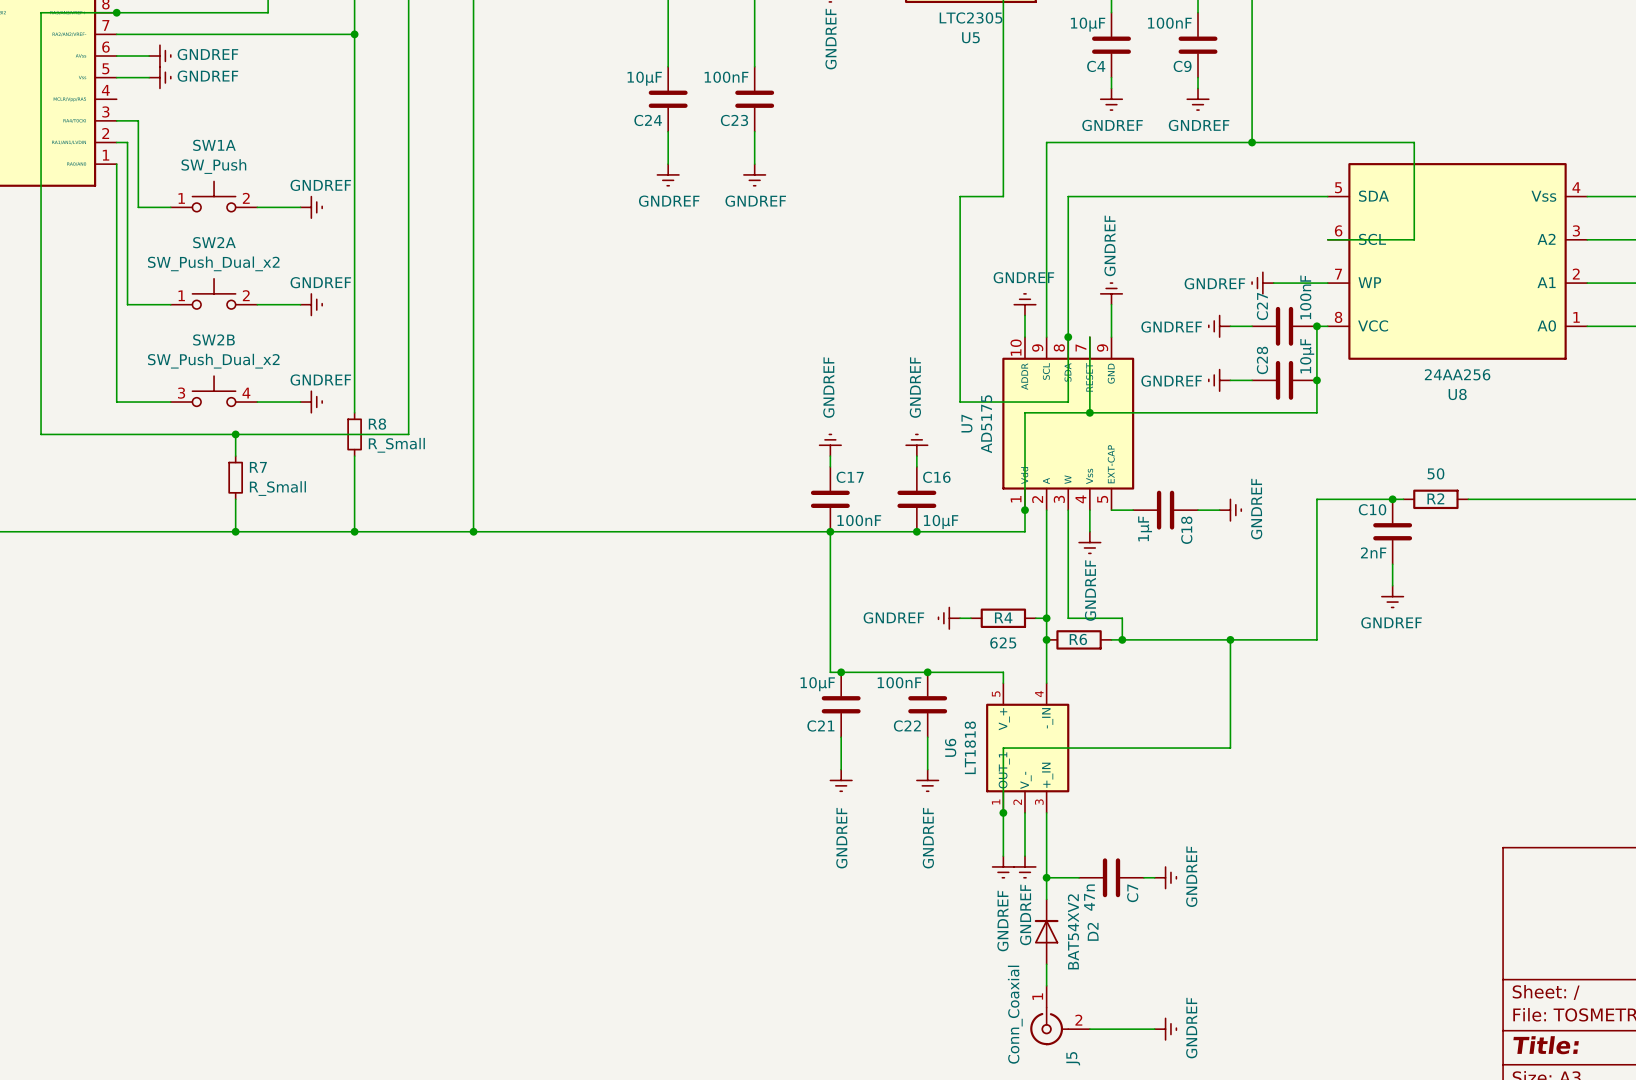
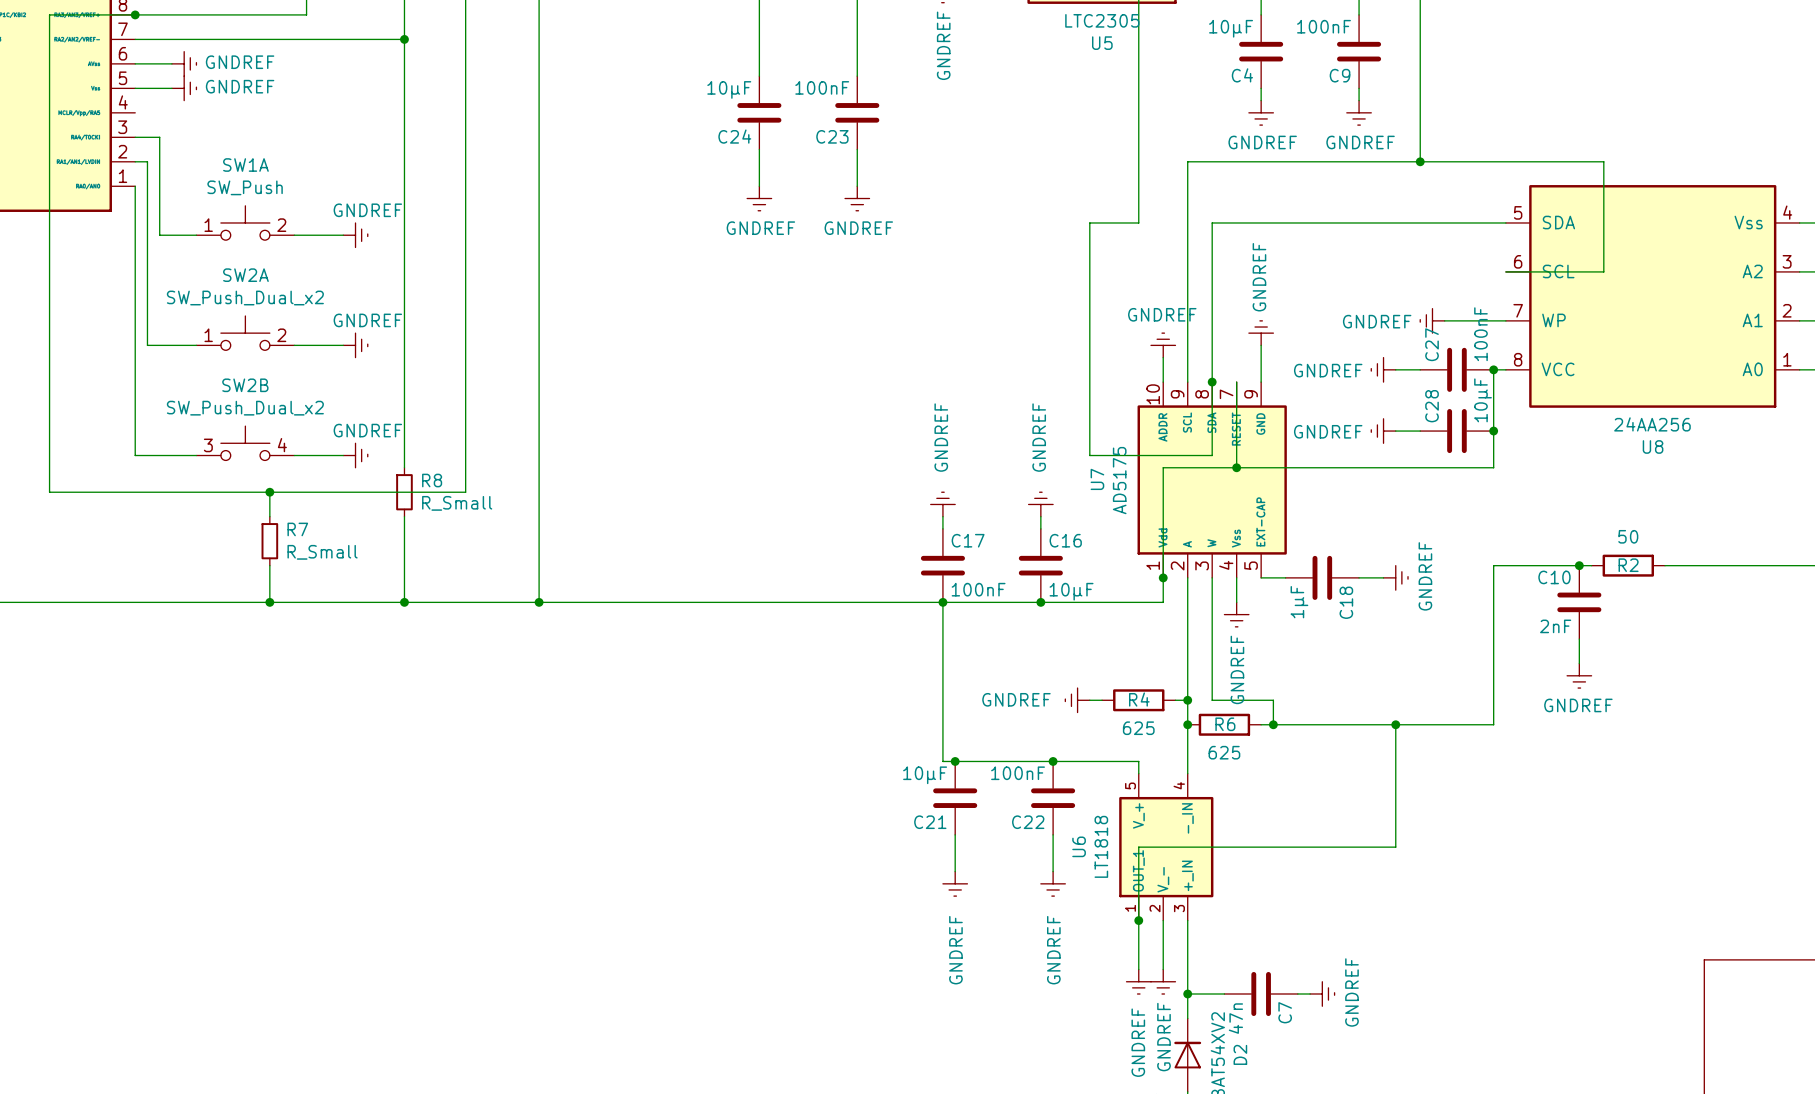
R6 value: none -> 625 (1224, 752)

